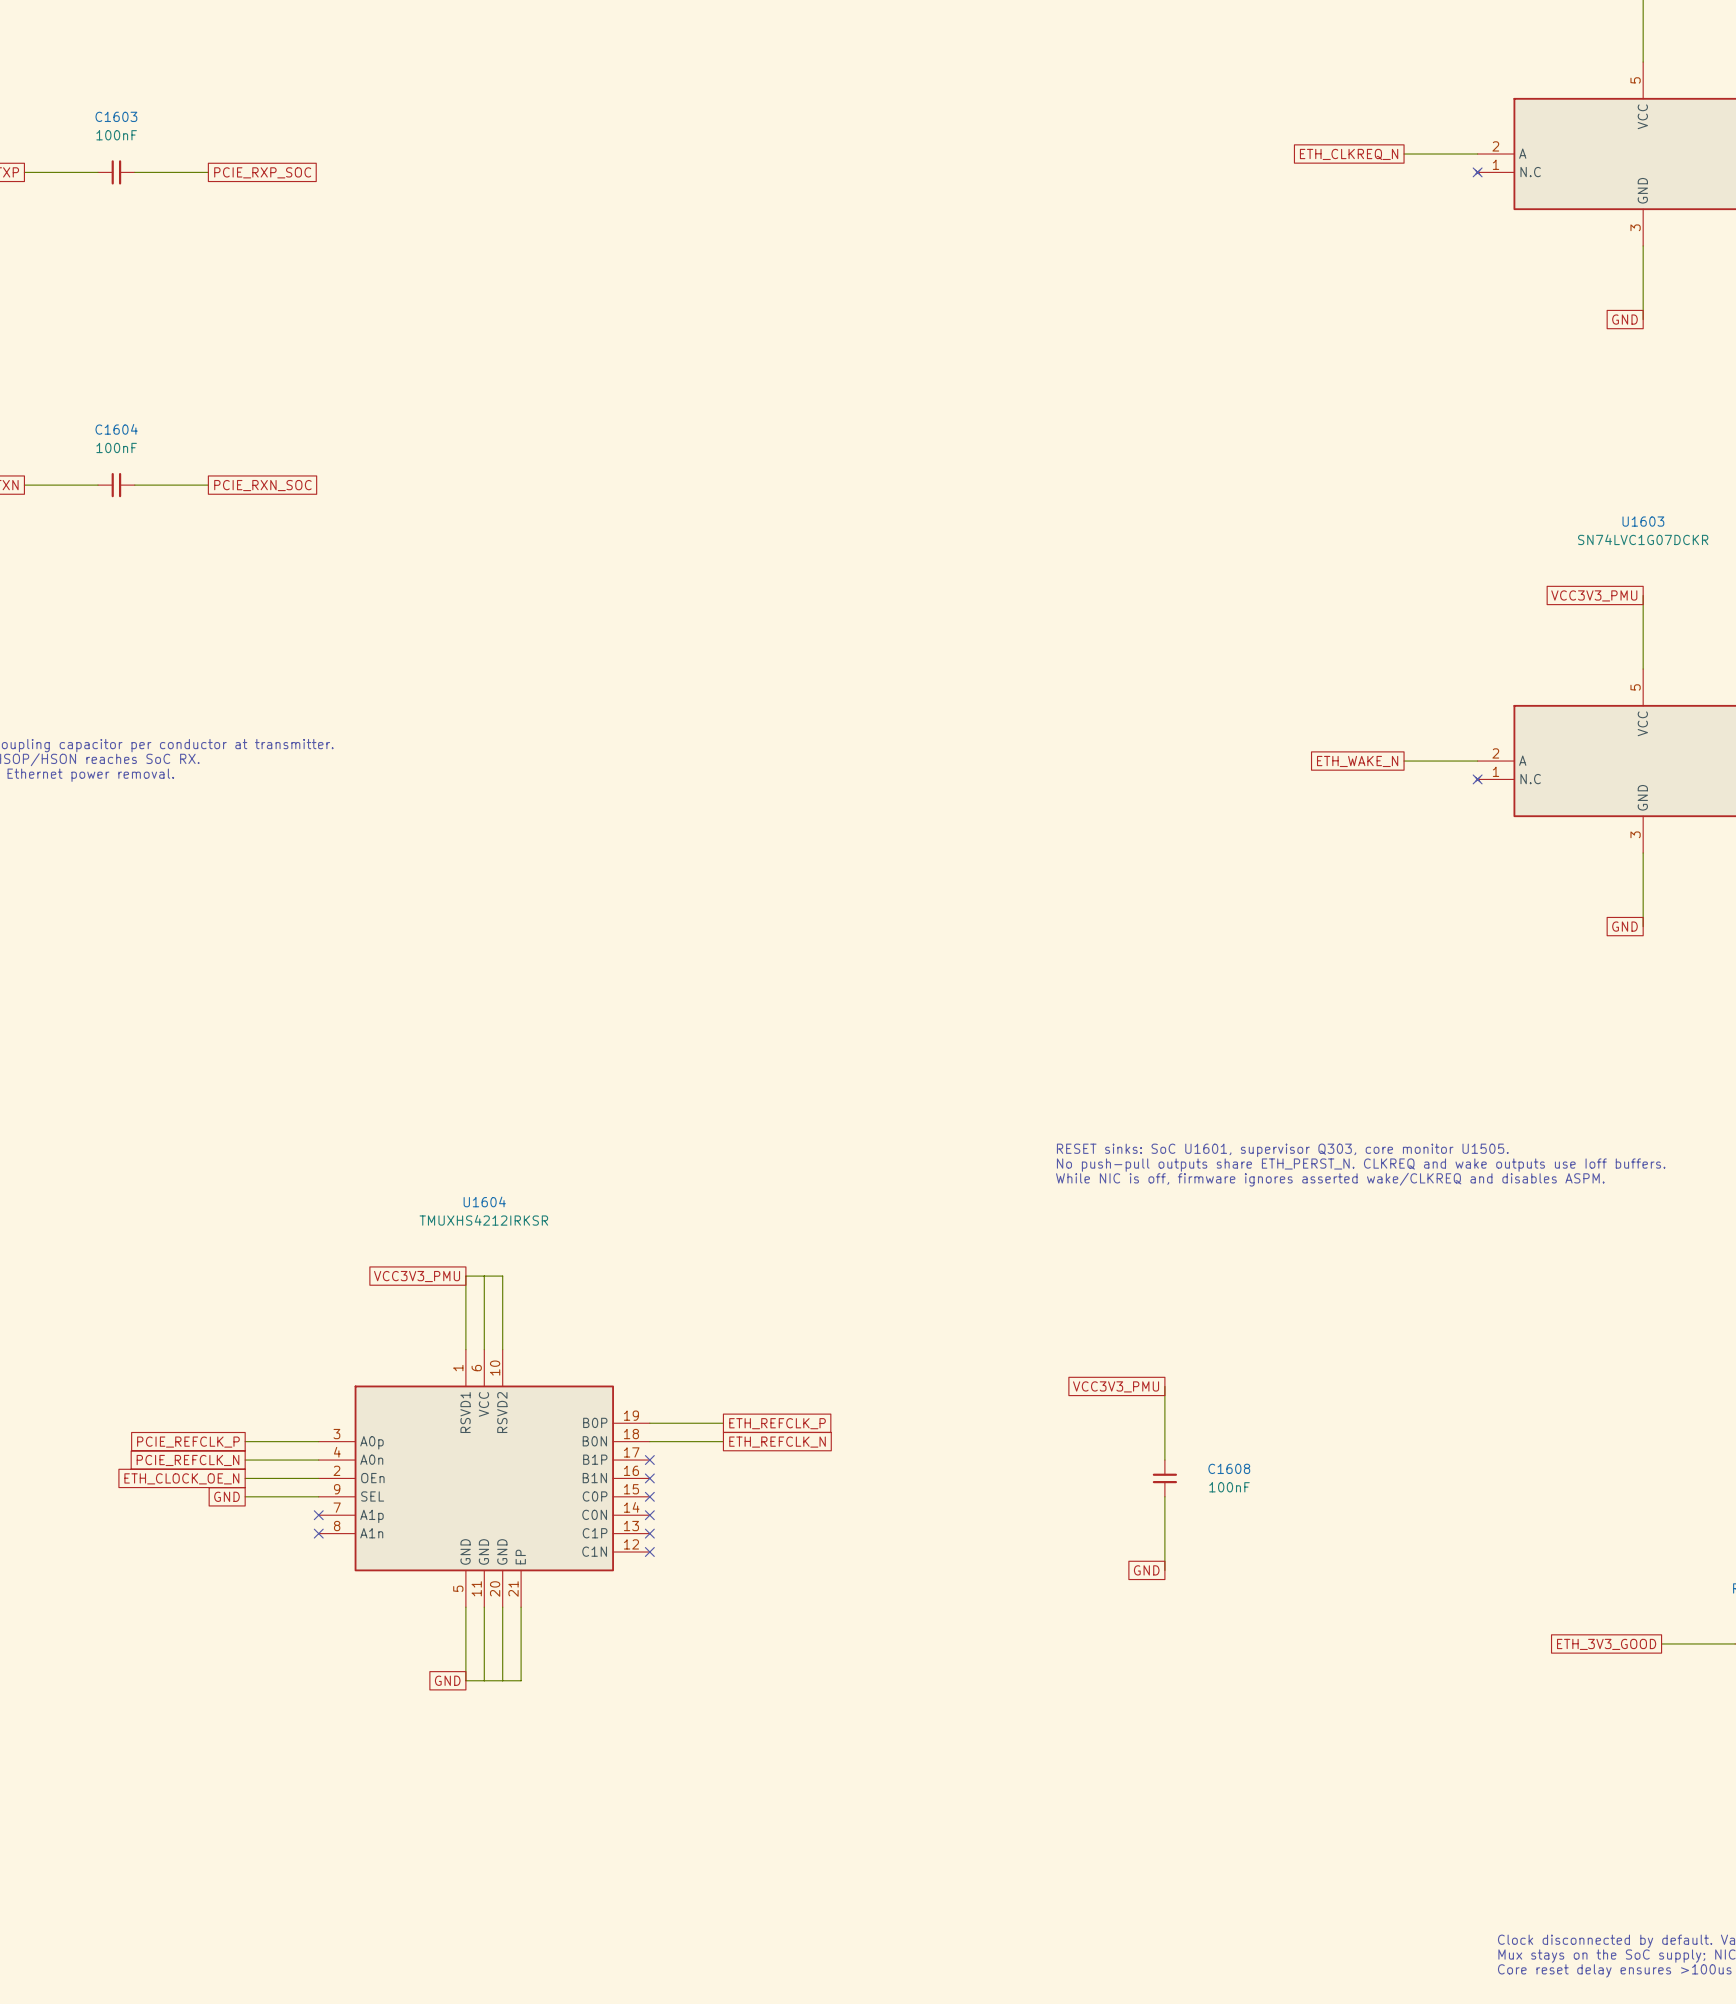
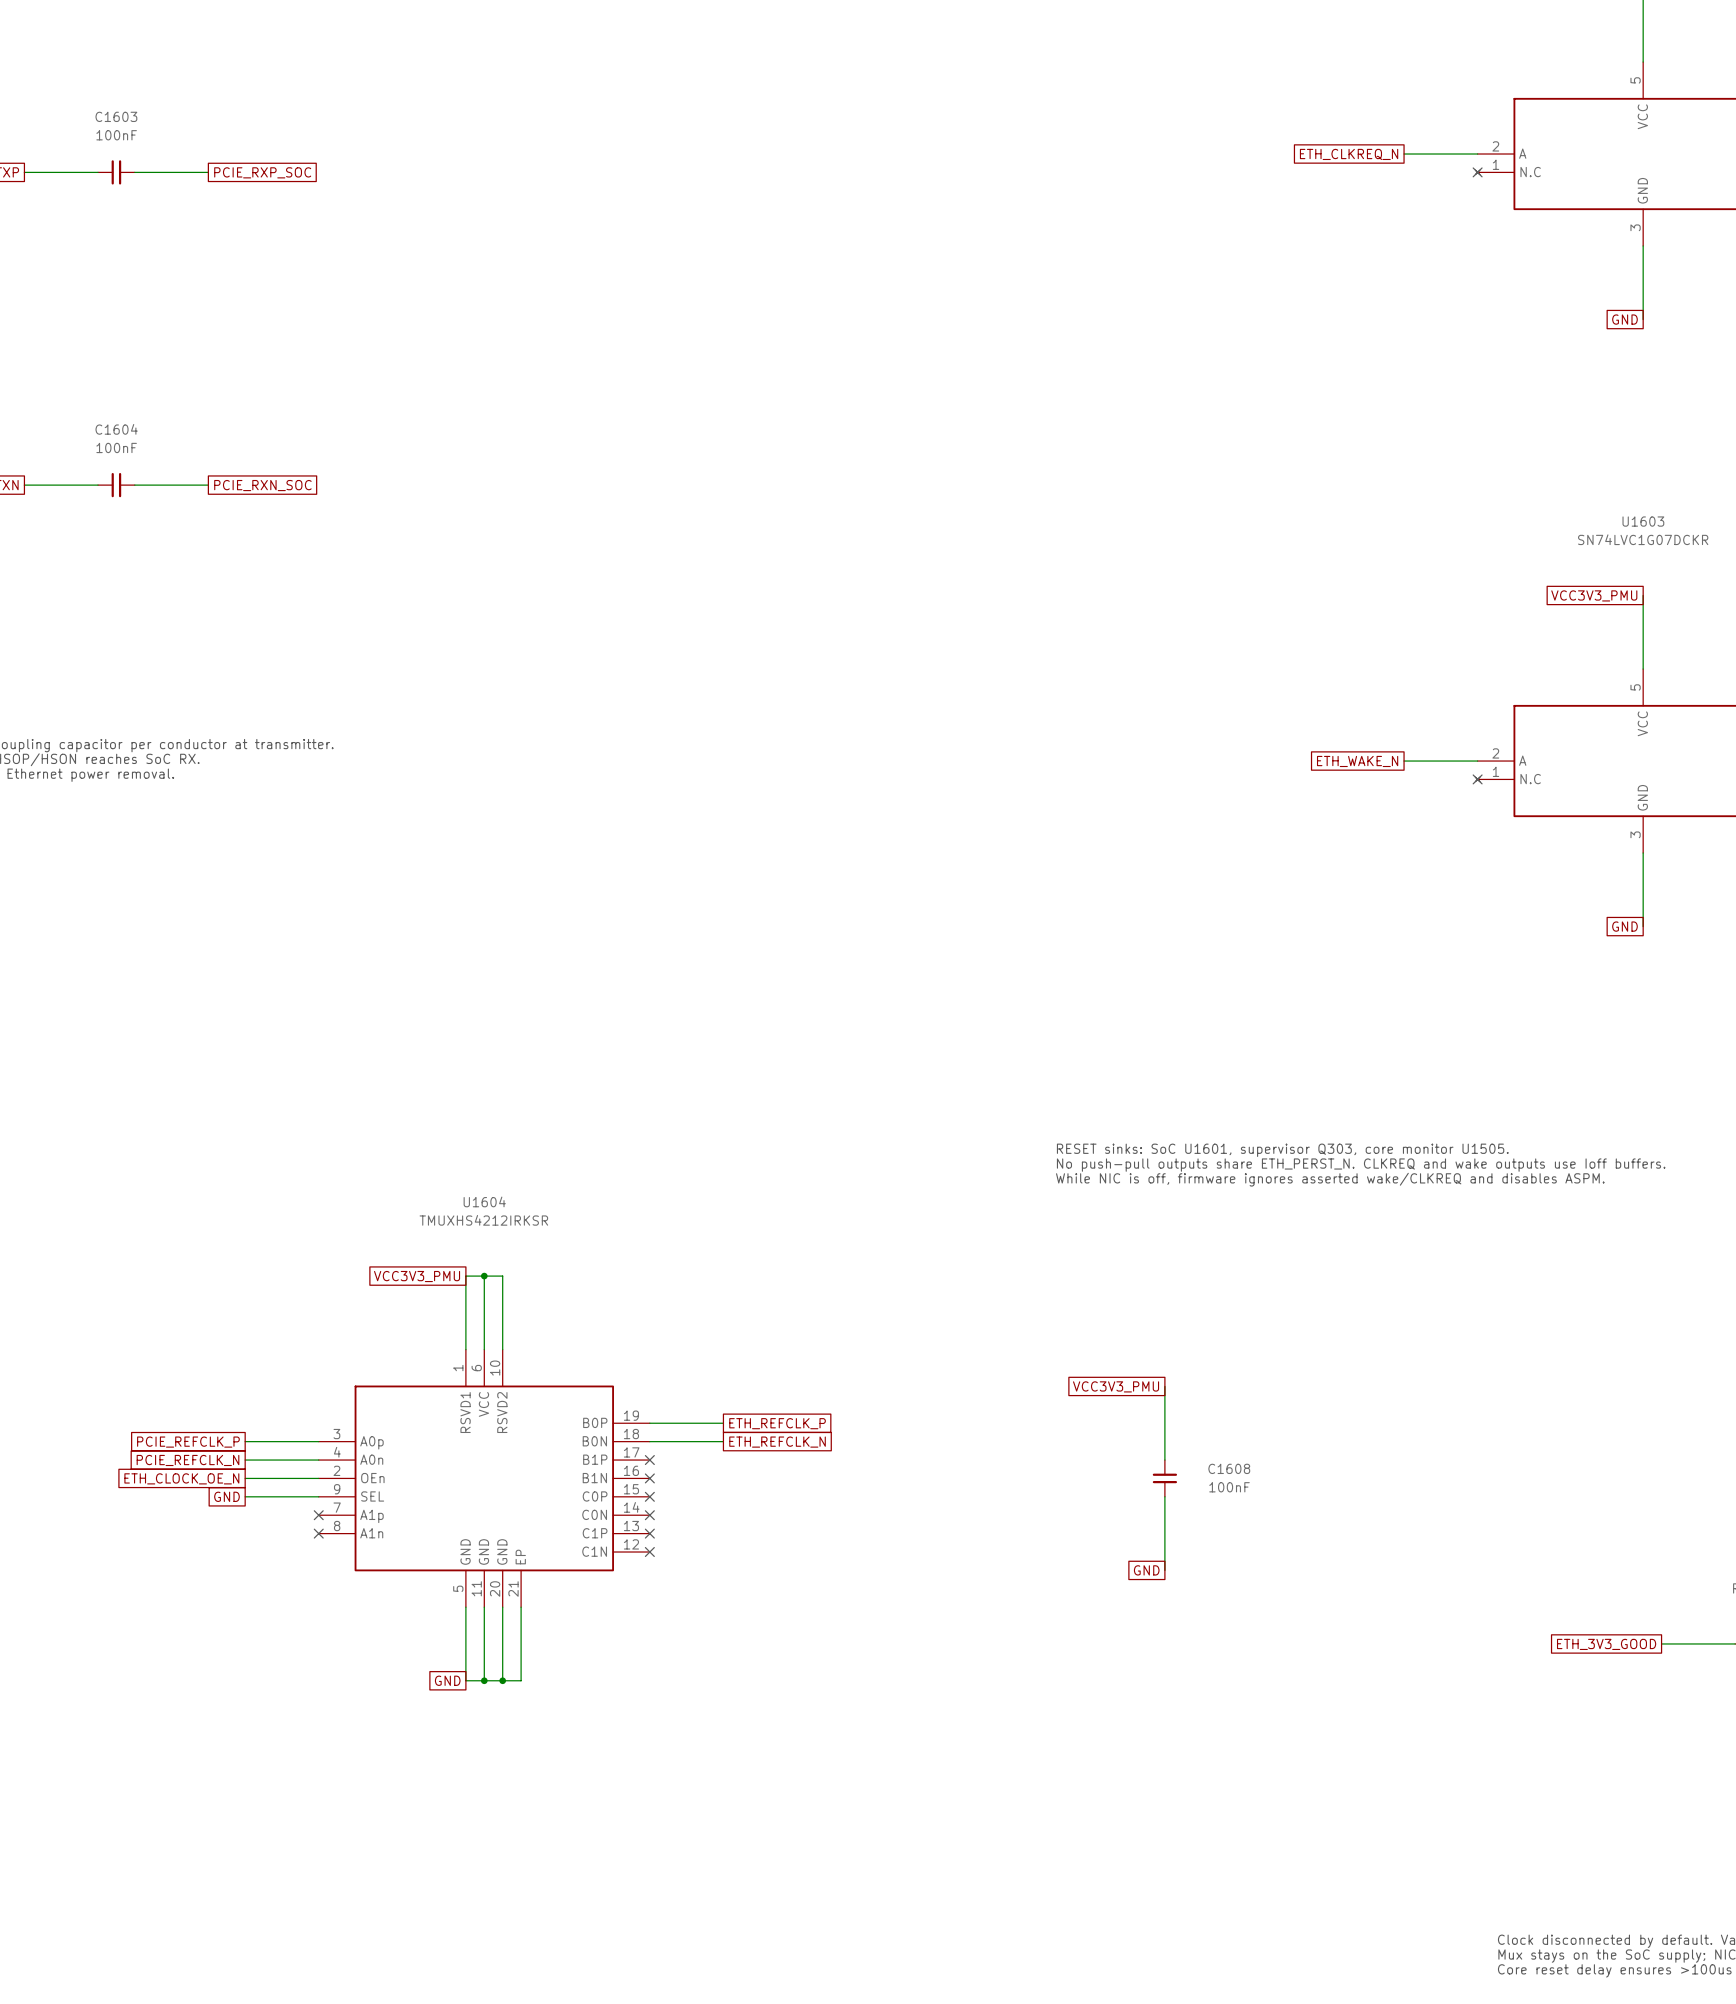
junction: none -> (484, 1276)
junction: none -> (484, 1680)
junction: none -> (502, 1680)

